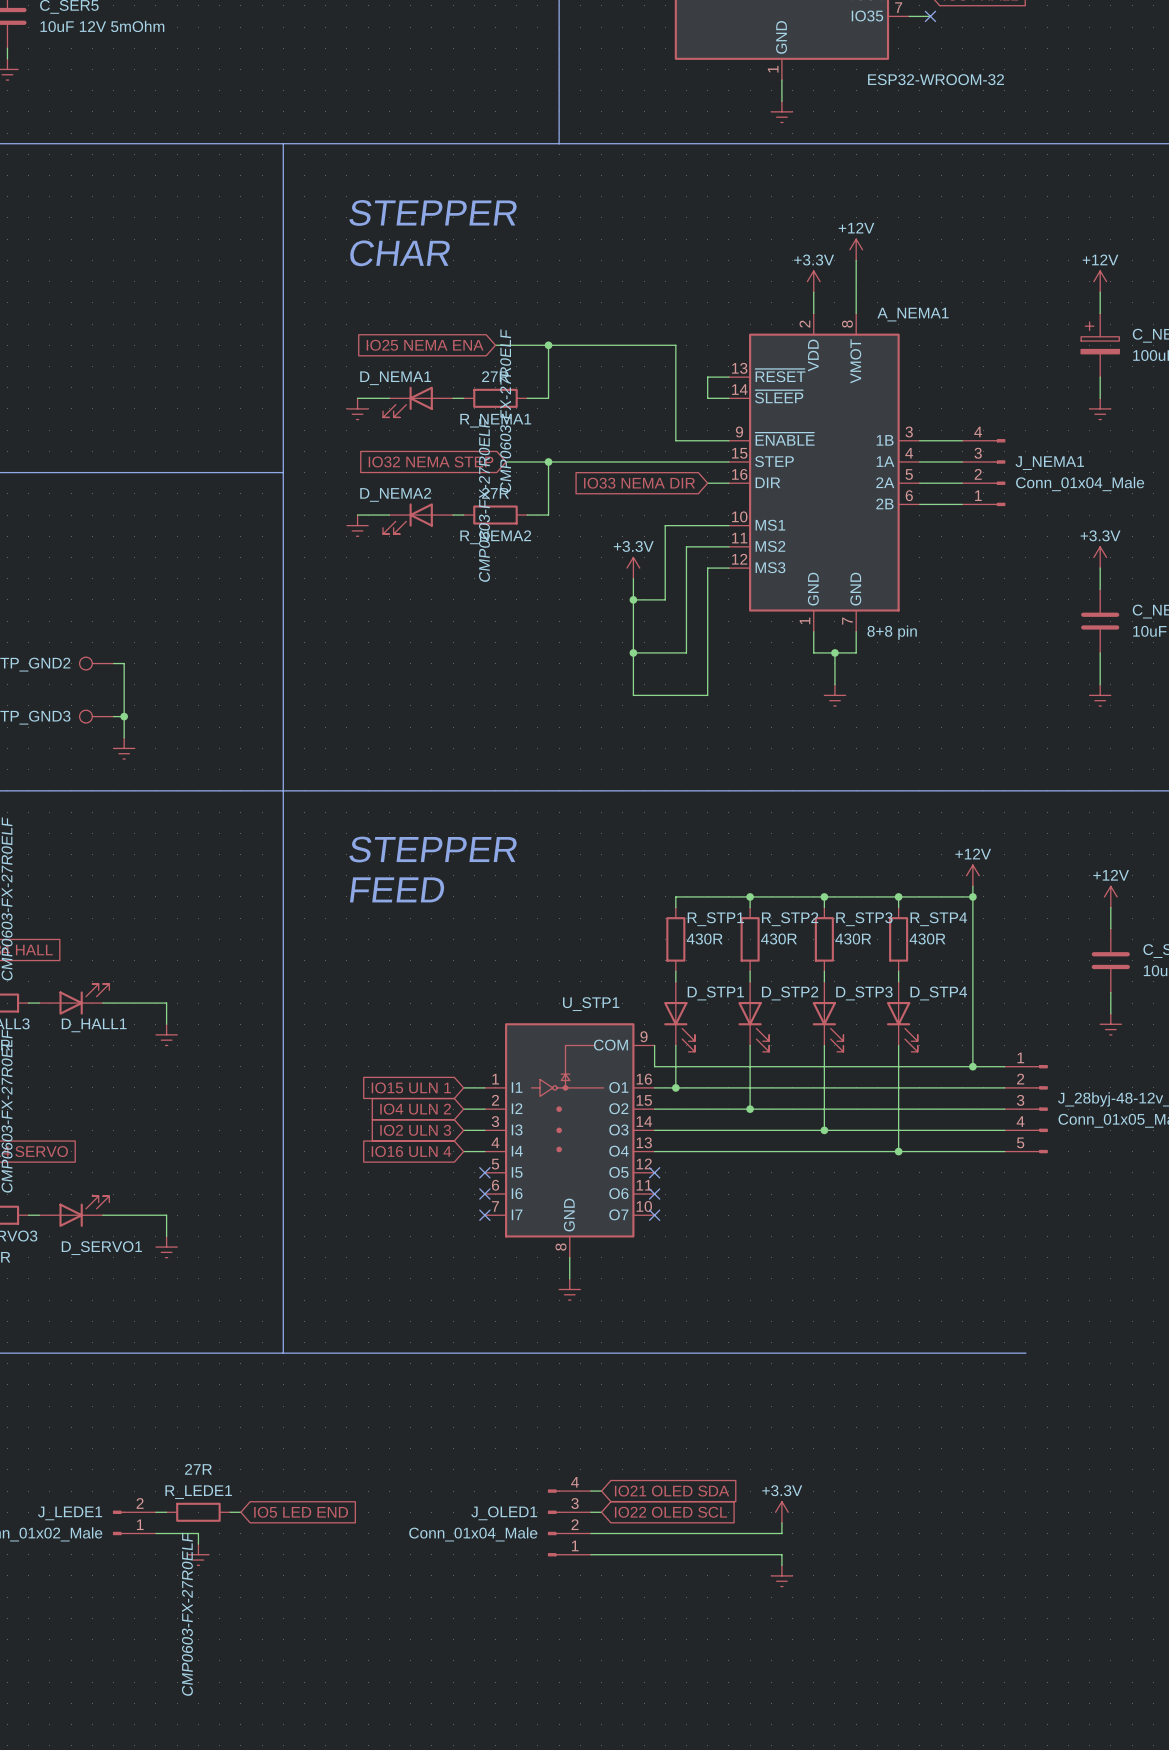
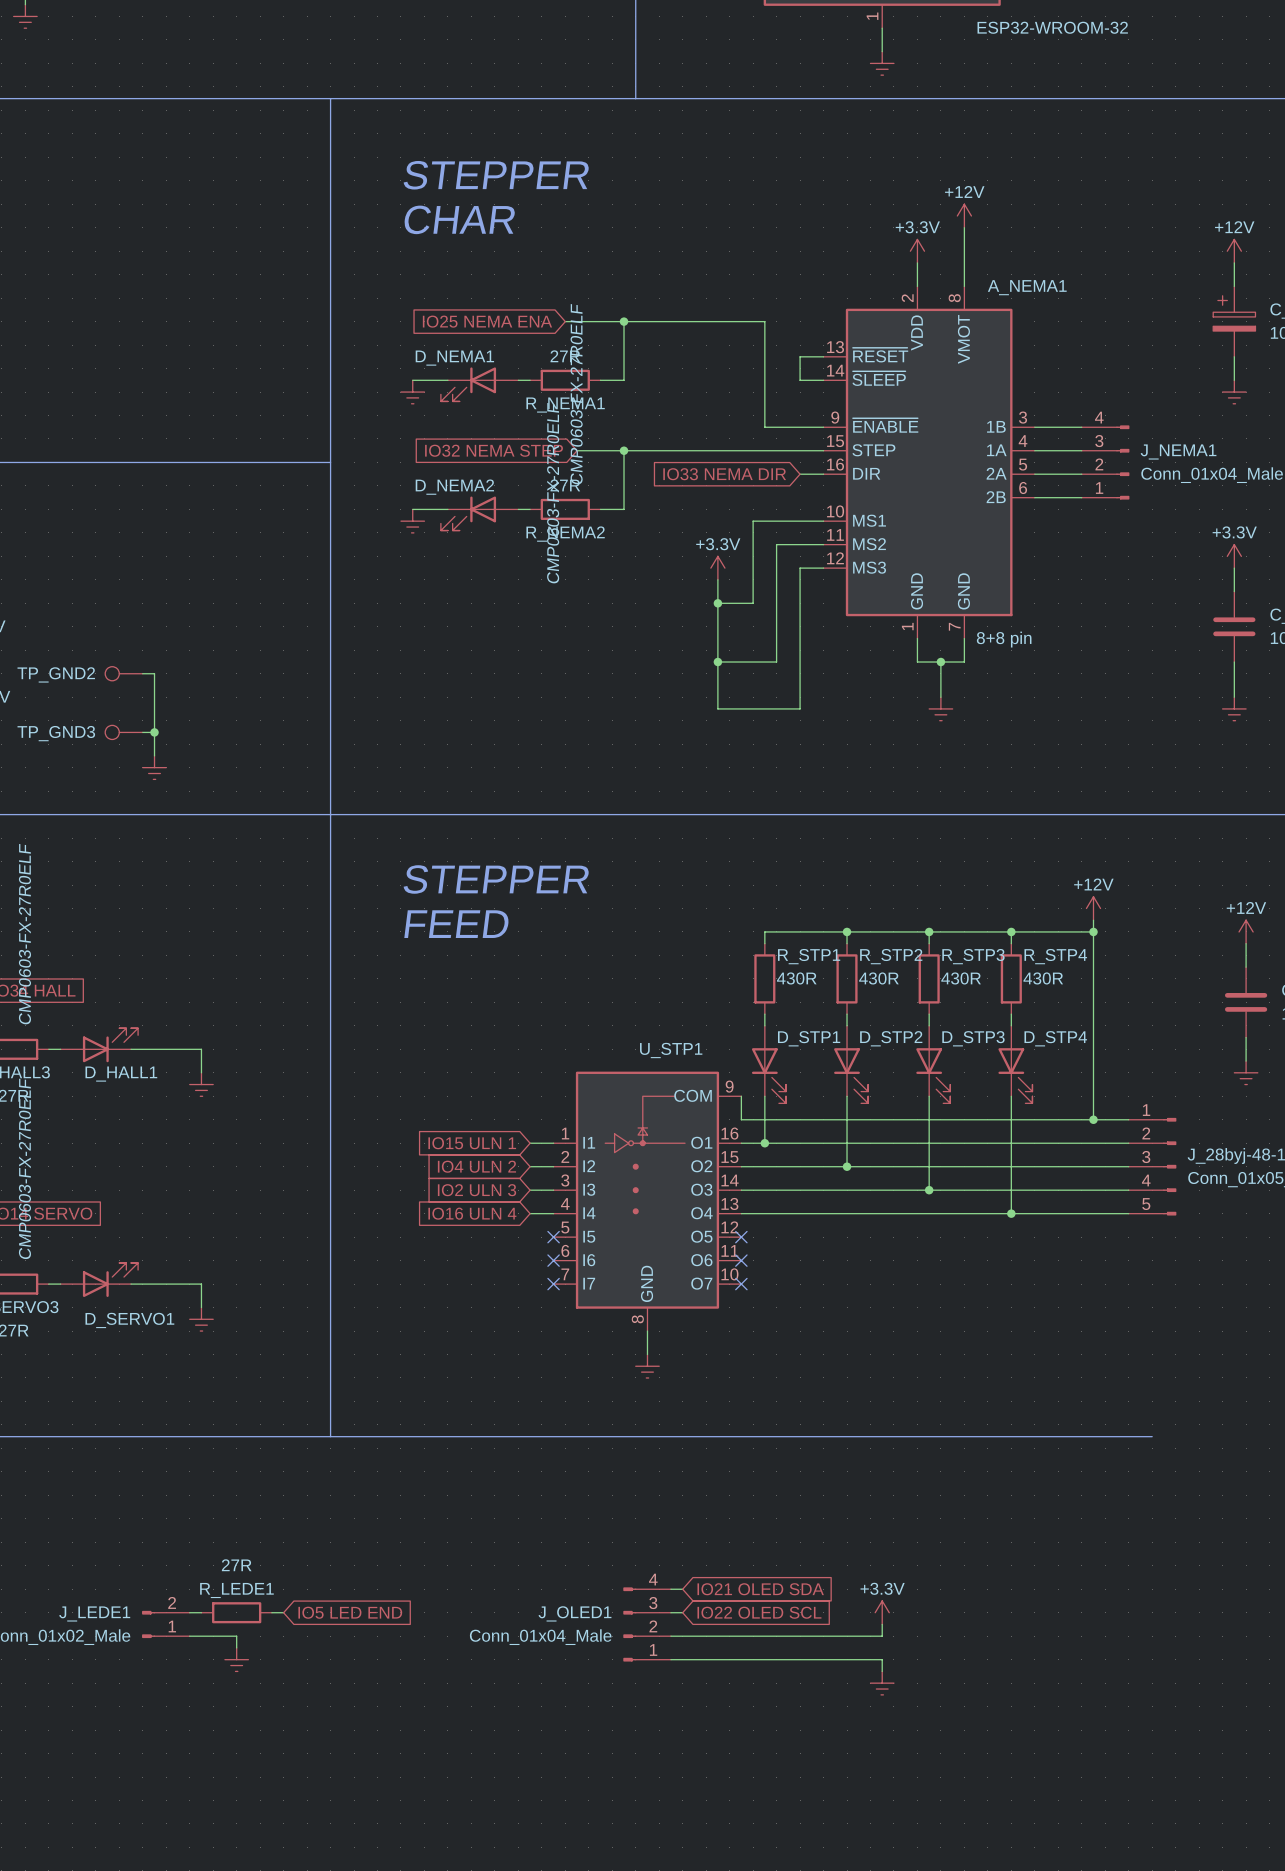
R_LEDE1 text: CMP0603-FX-27R0ELF (187, 1614) -> none

